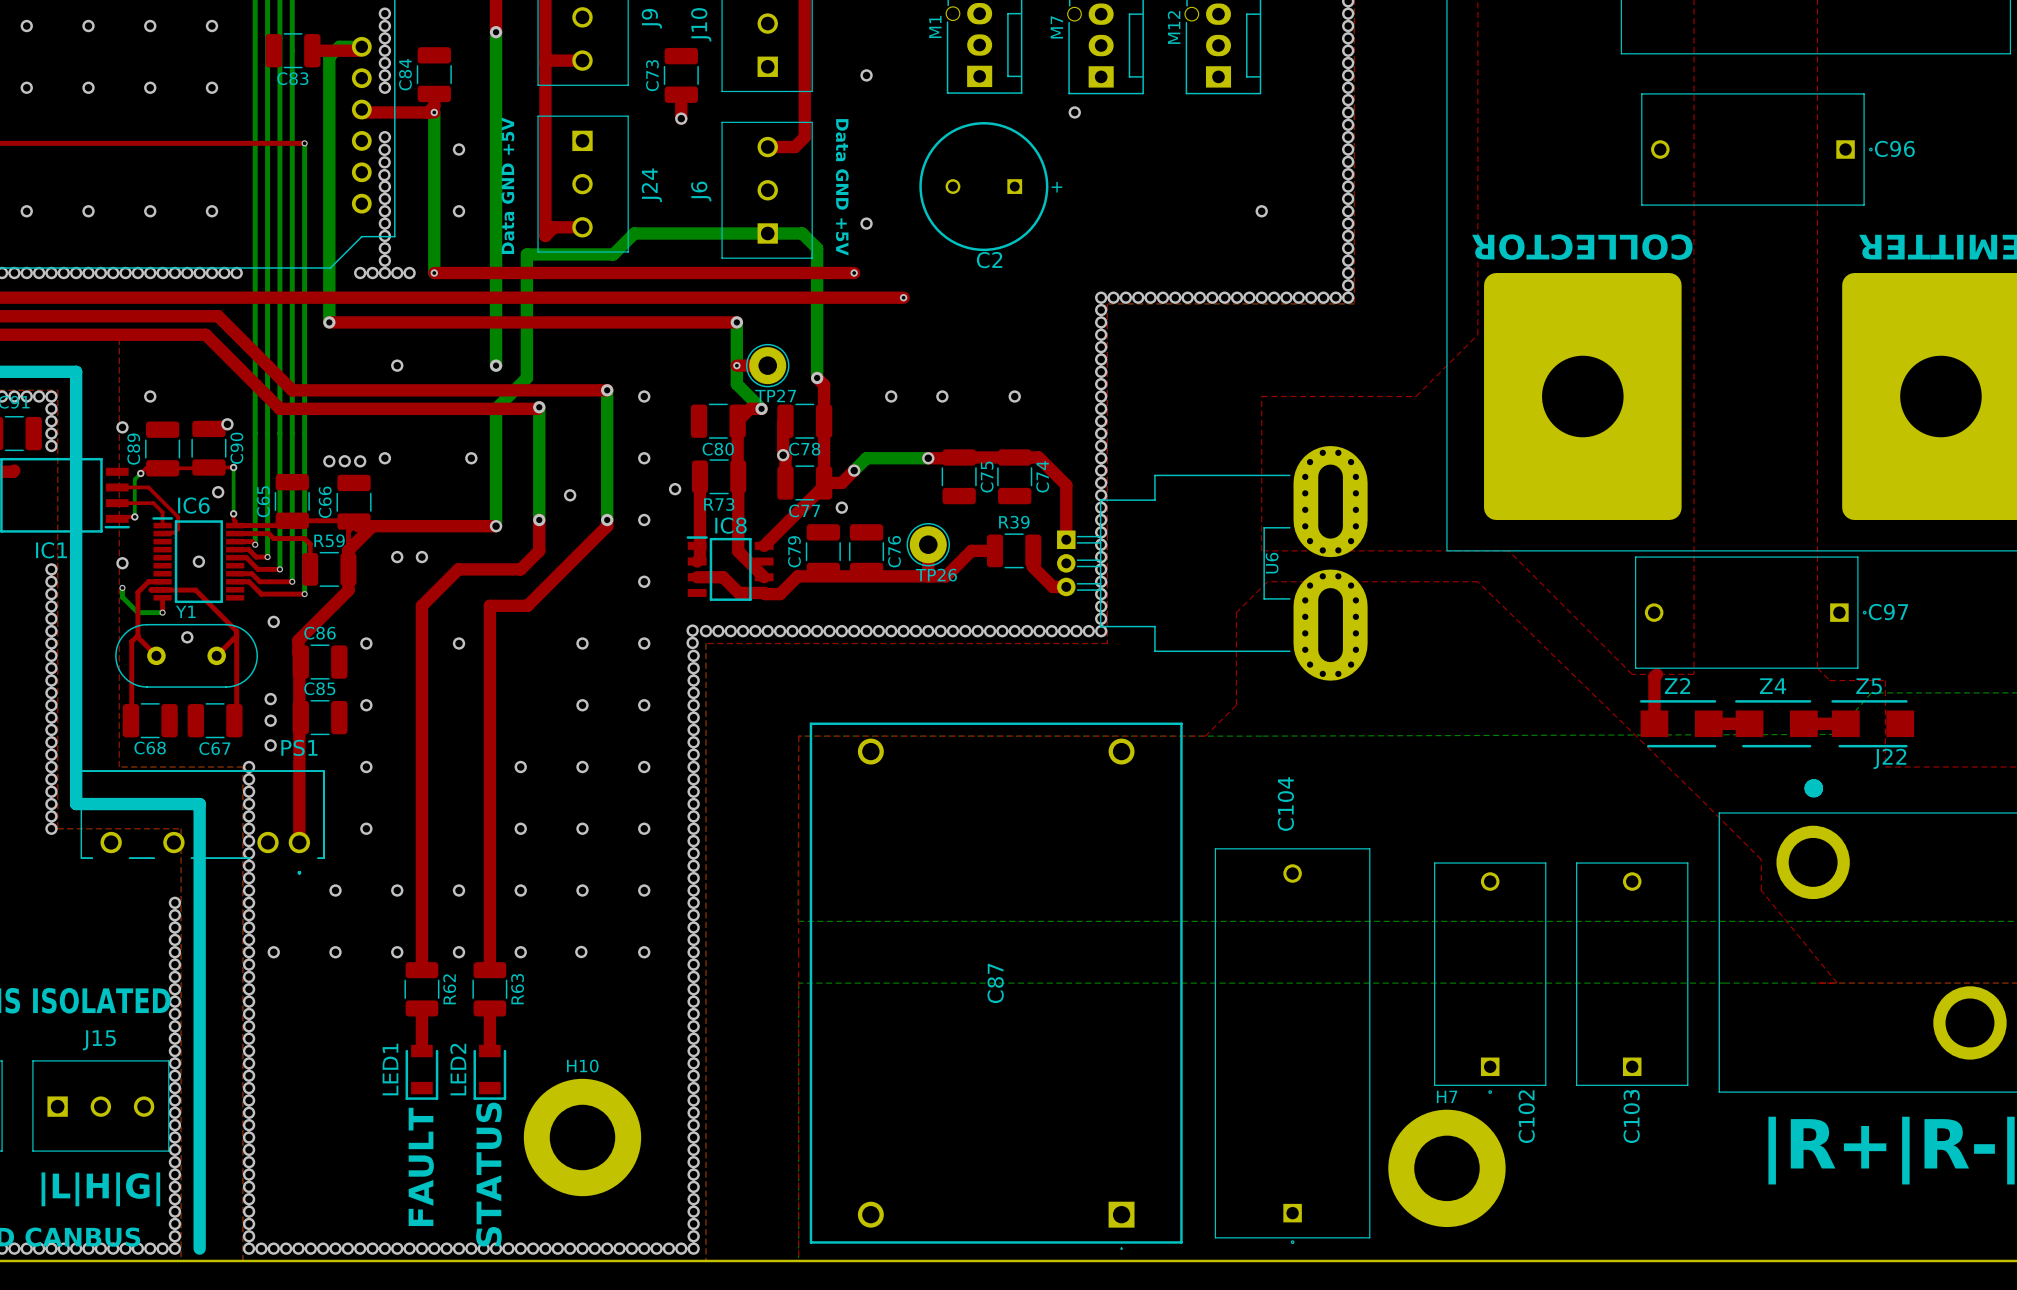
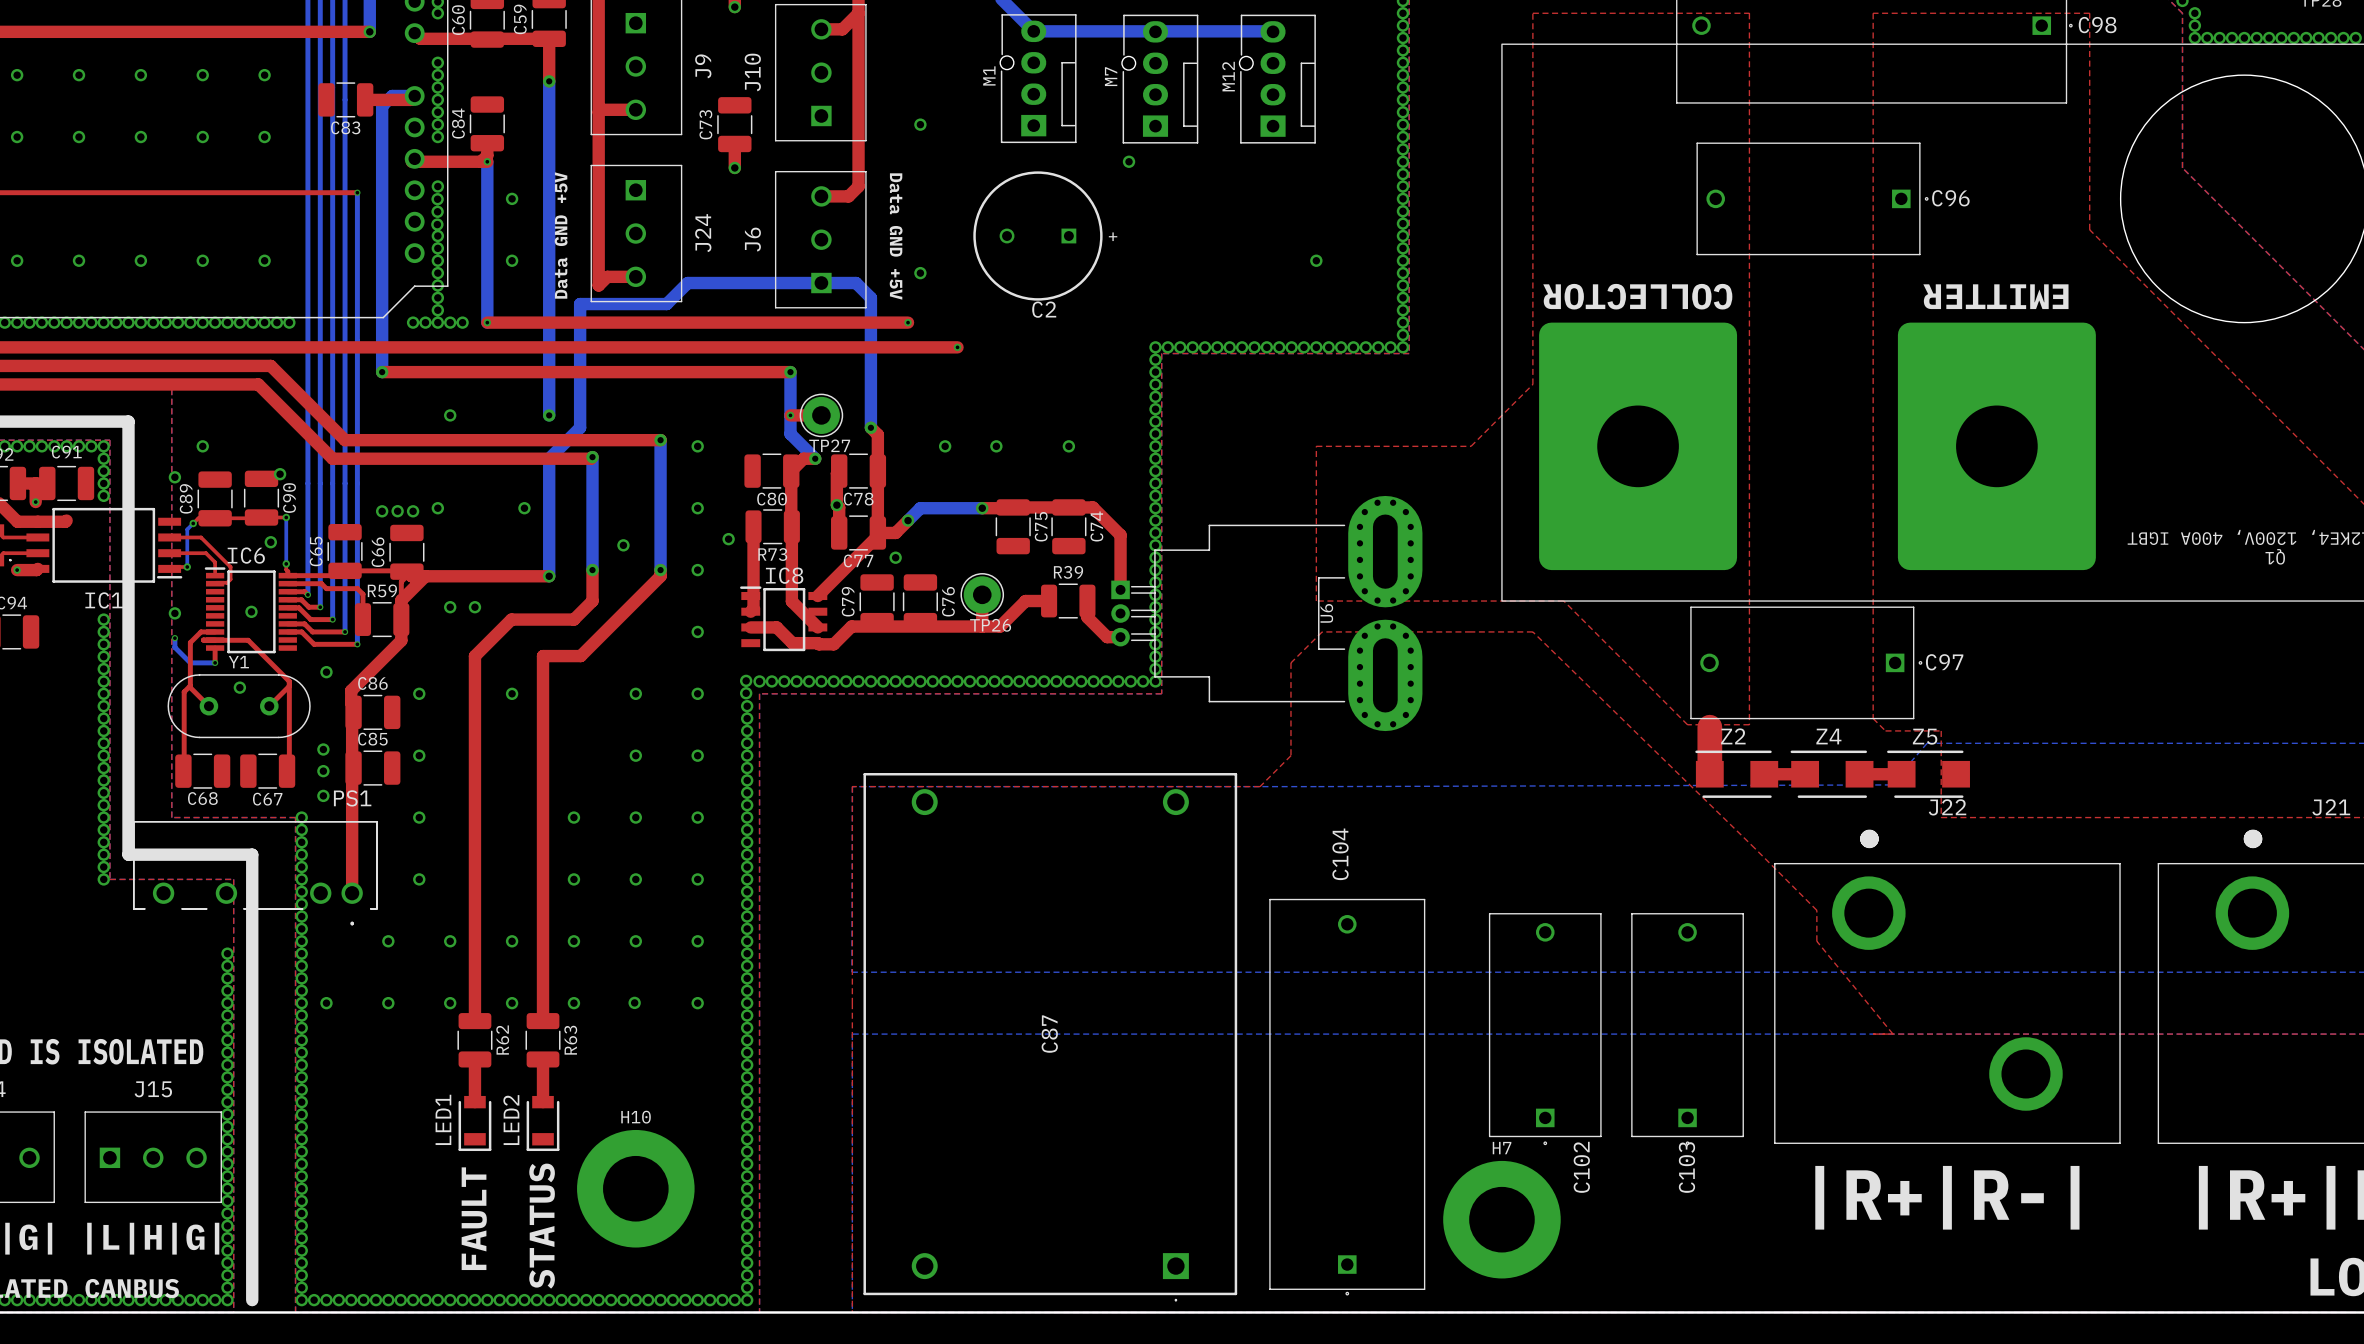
top track width: thin (1654, 676) (1654, 711) -> thick (1709, 727) (1709, 761)

